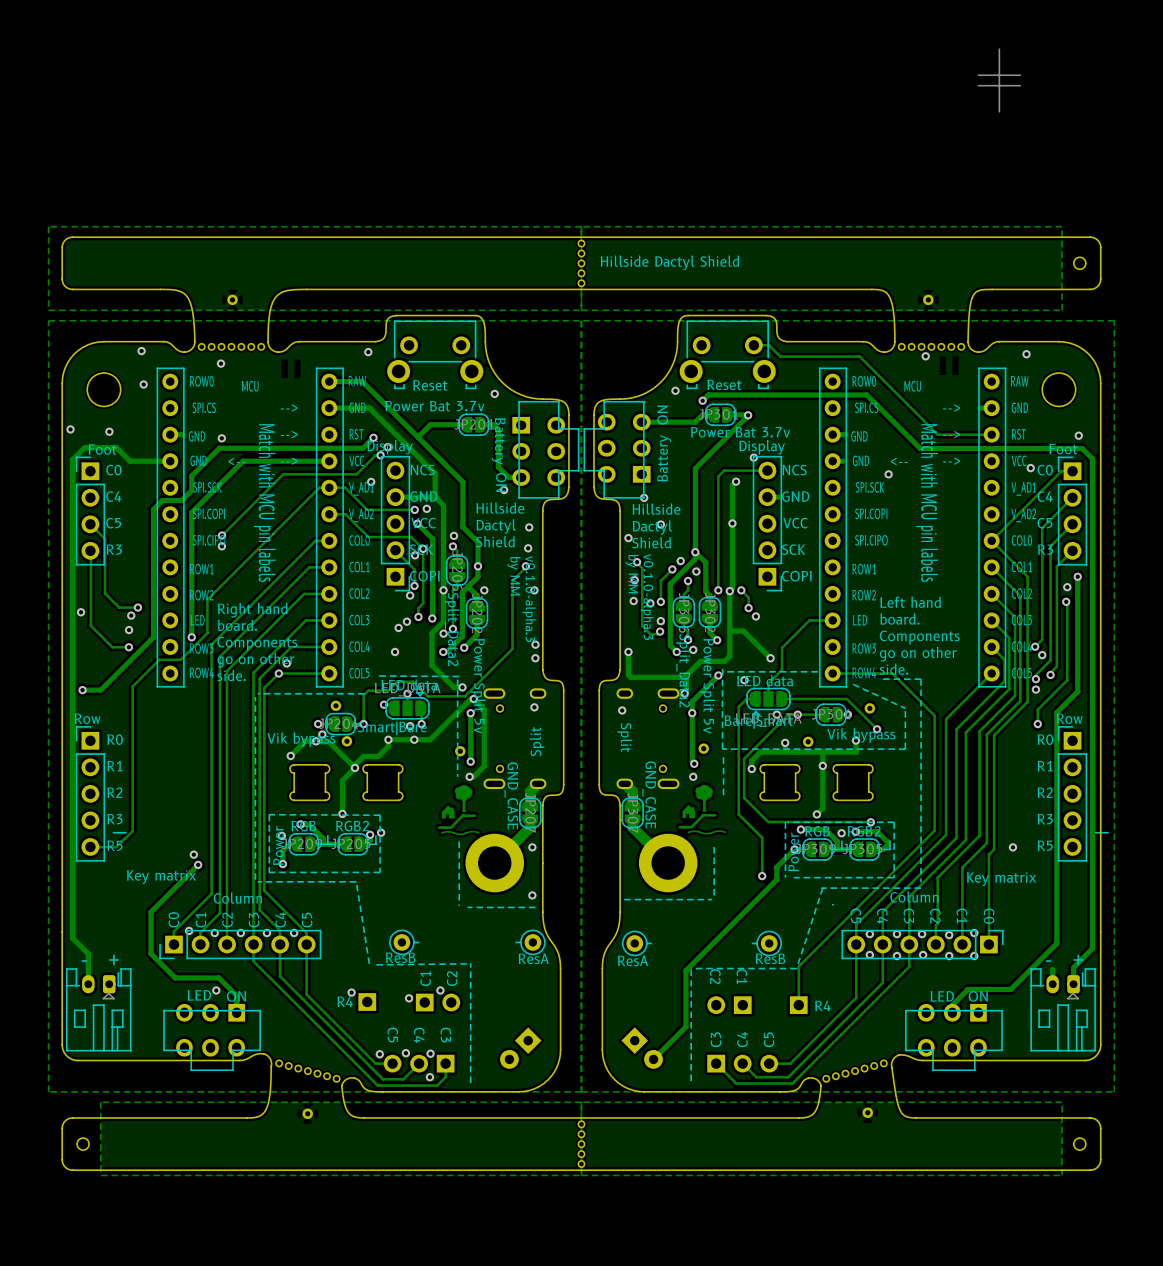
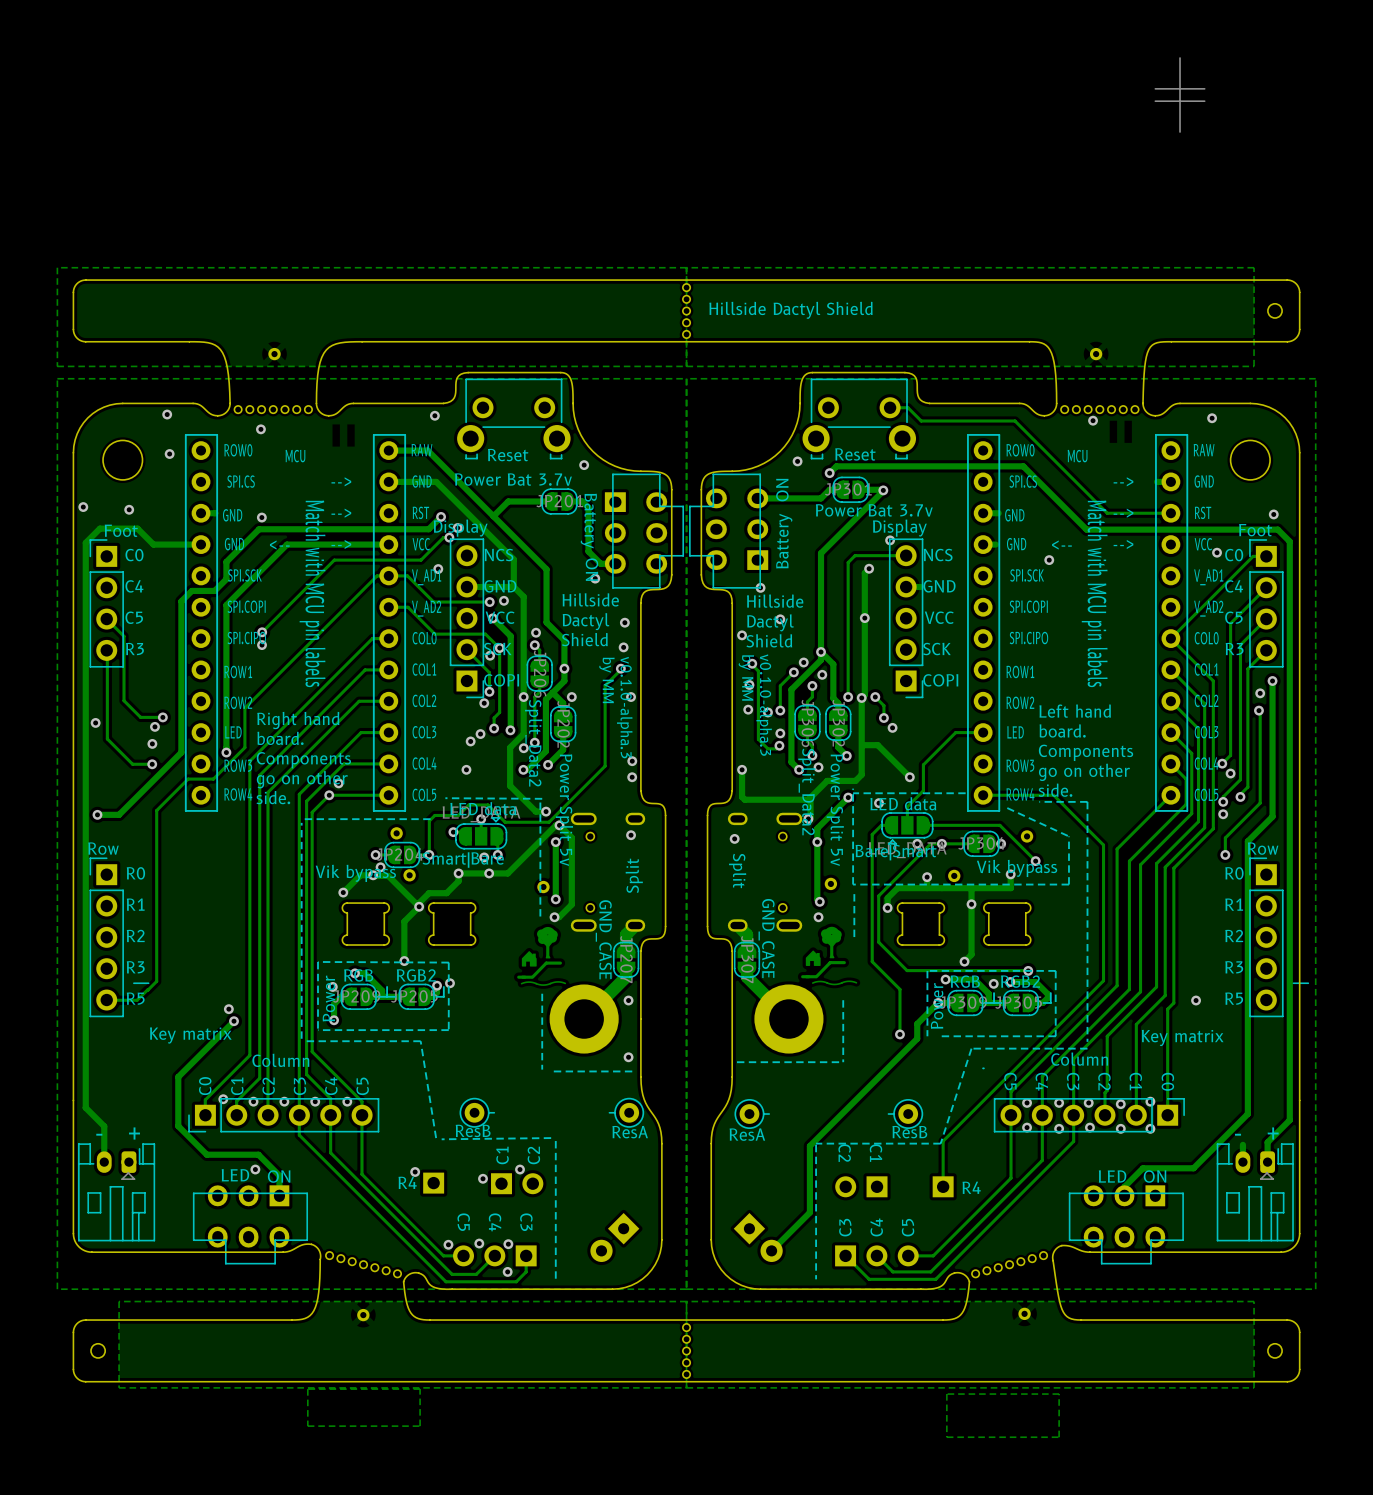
zone outline: none -> (420, 1389) (307, 1389) (307, 1426) (420, 1426) (420, 1389)
zone outline: none -> (1059, 1394) (946, 1394) (946, 1437) (1059, 1437) (1059, 1394)

